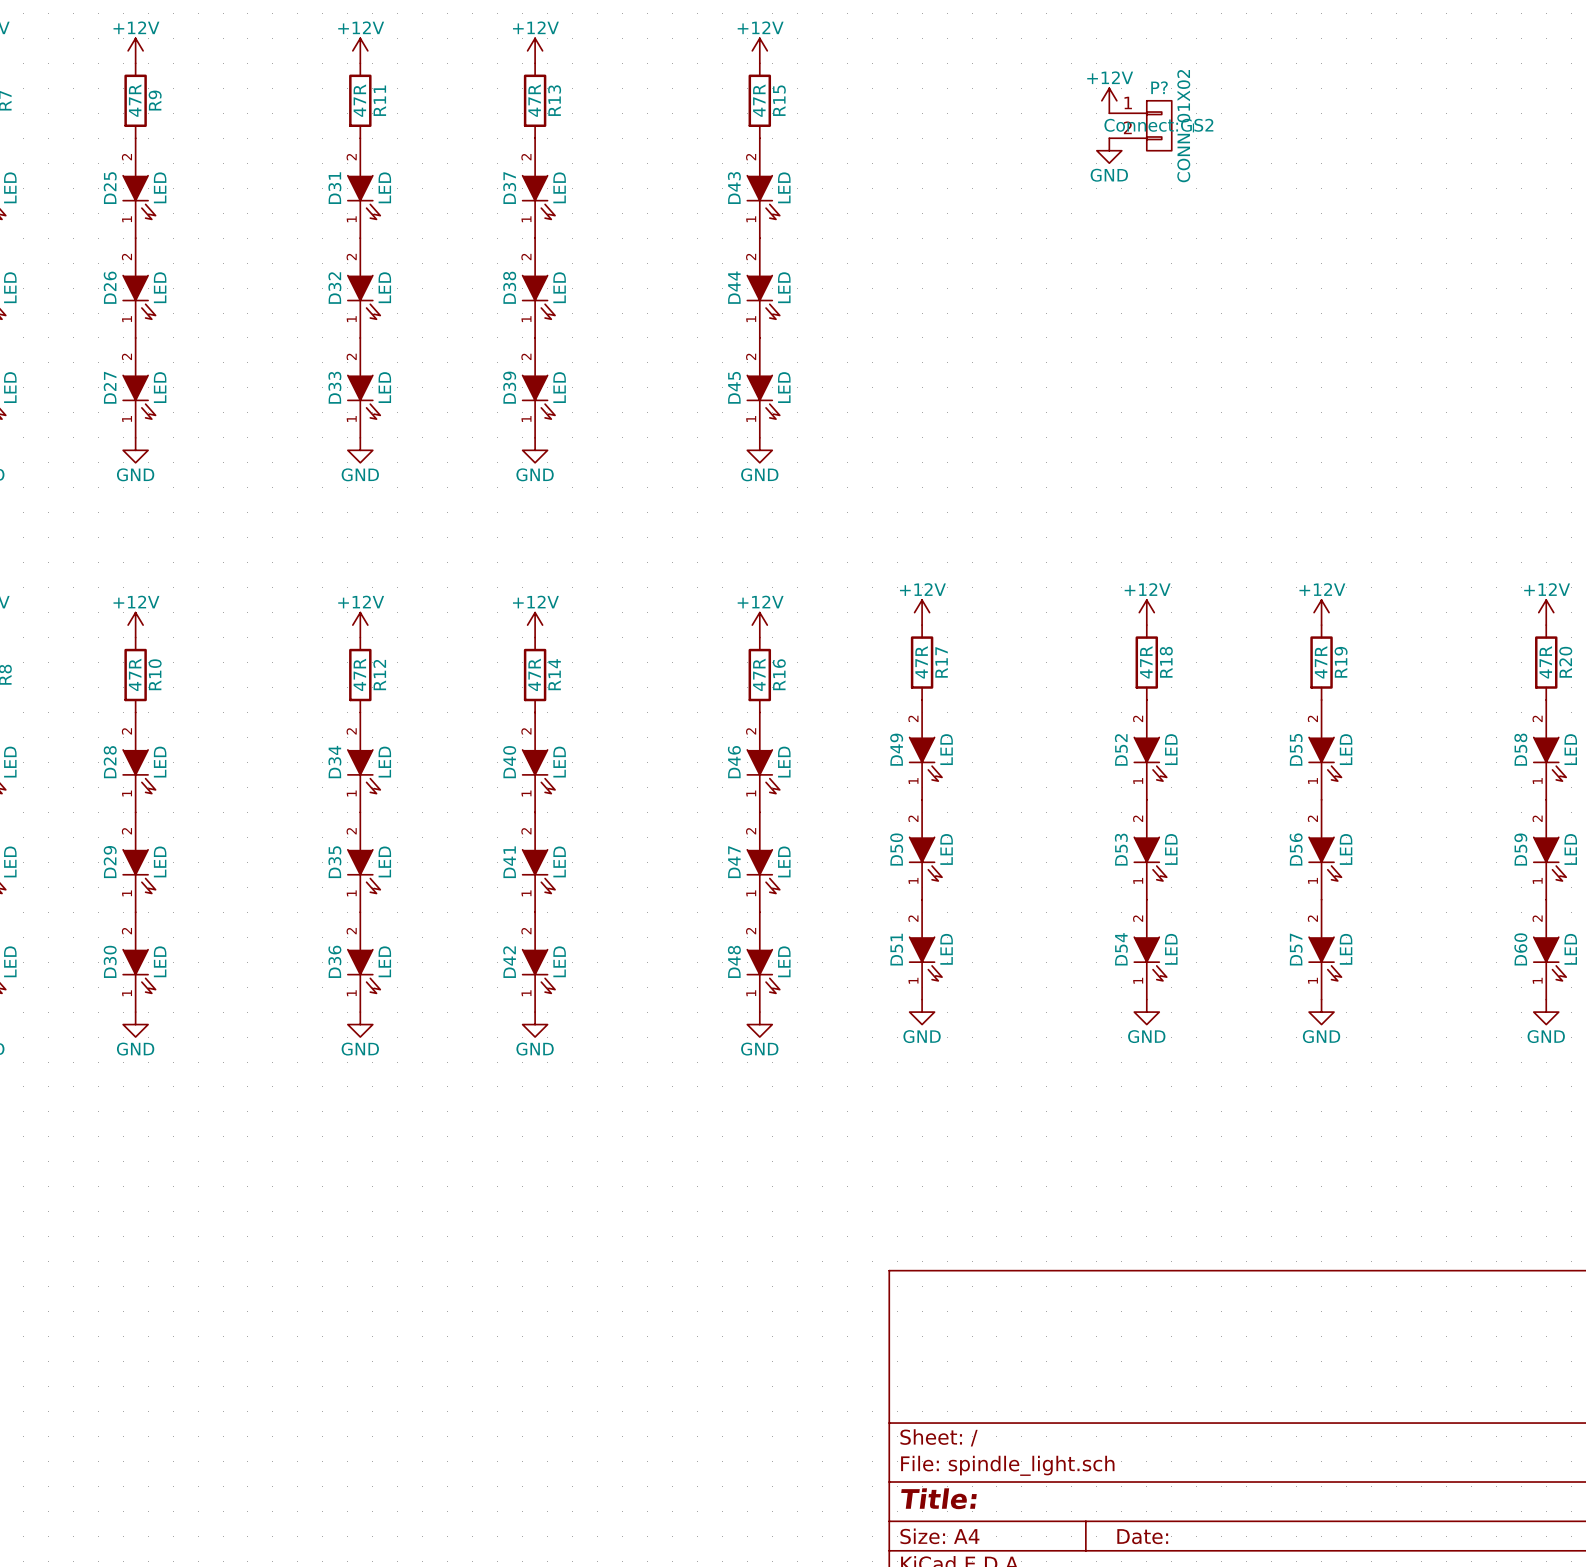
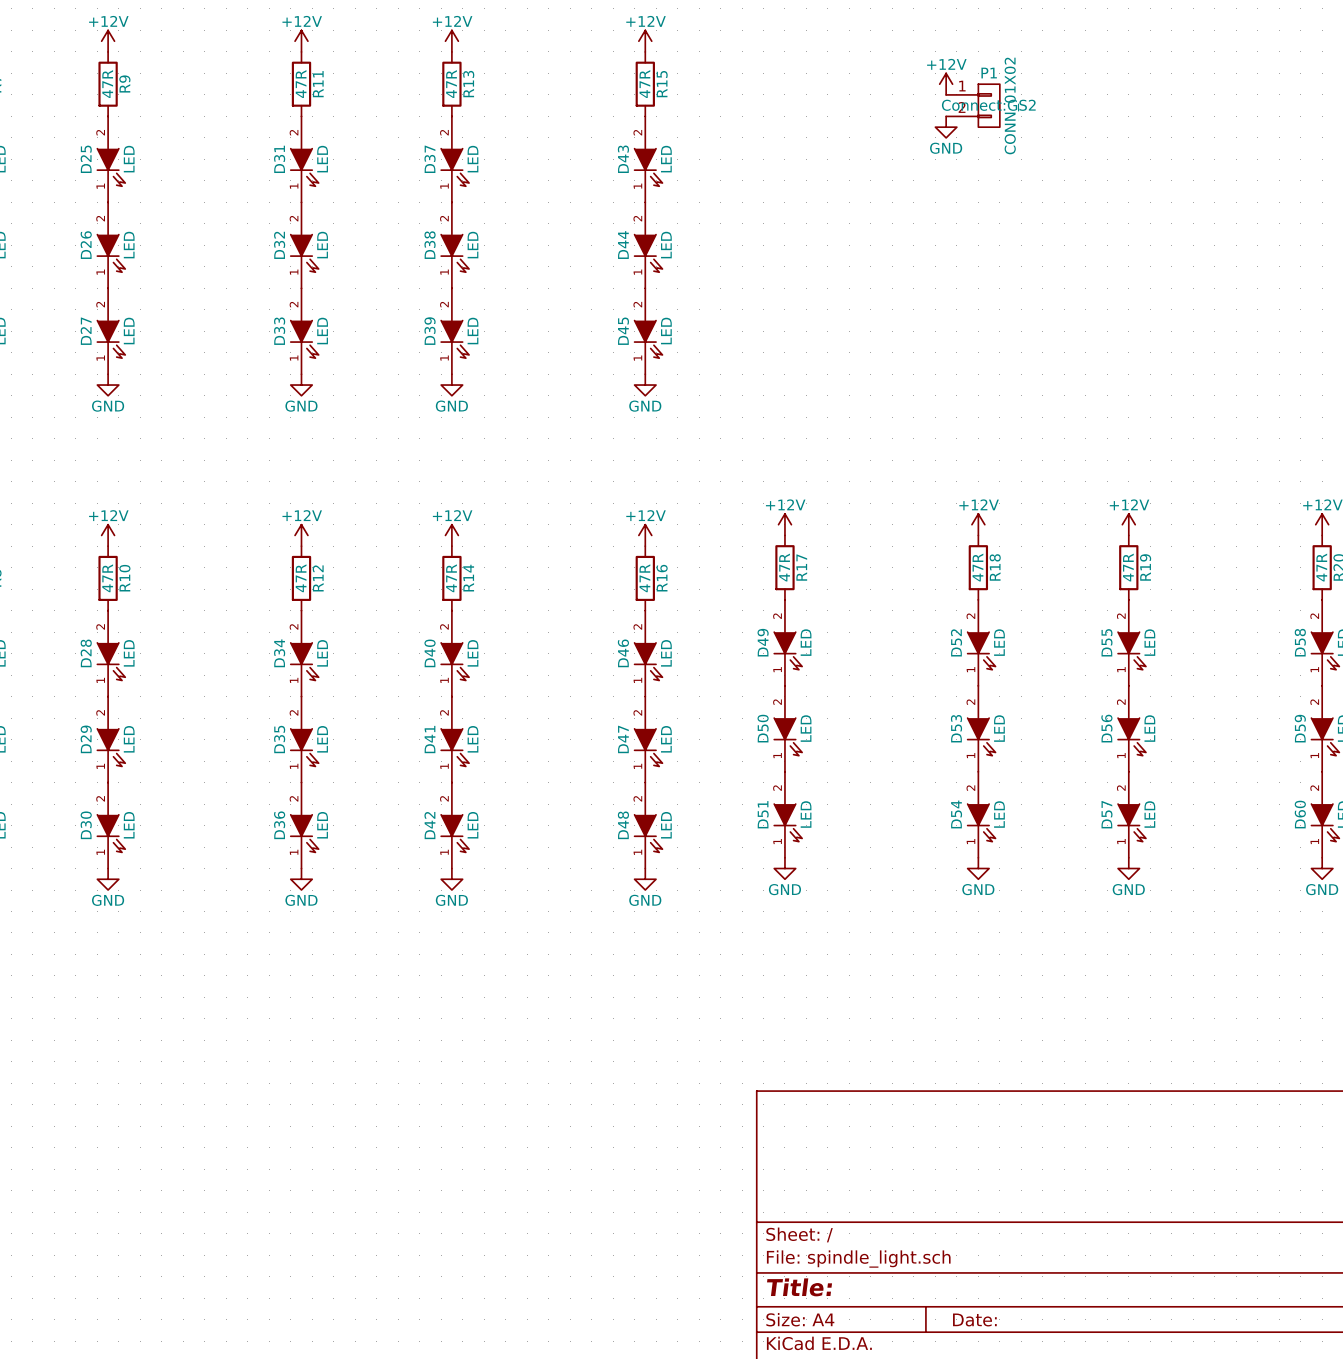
P? name: P? (1159, 87) -> P1 (989, 73)

